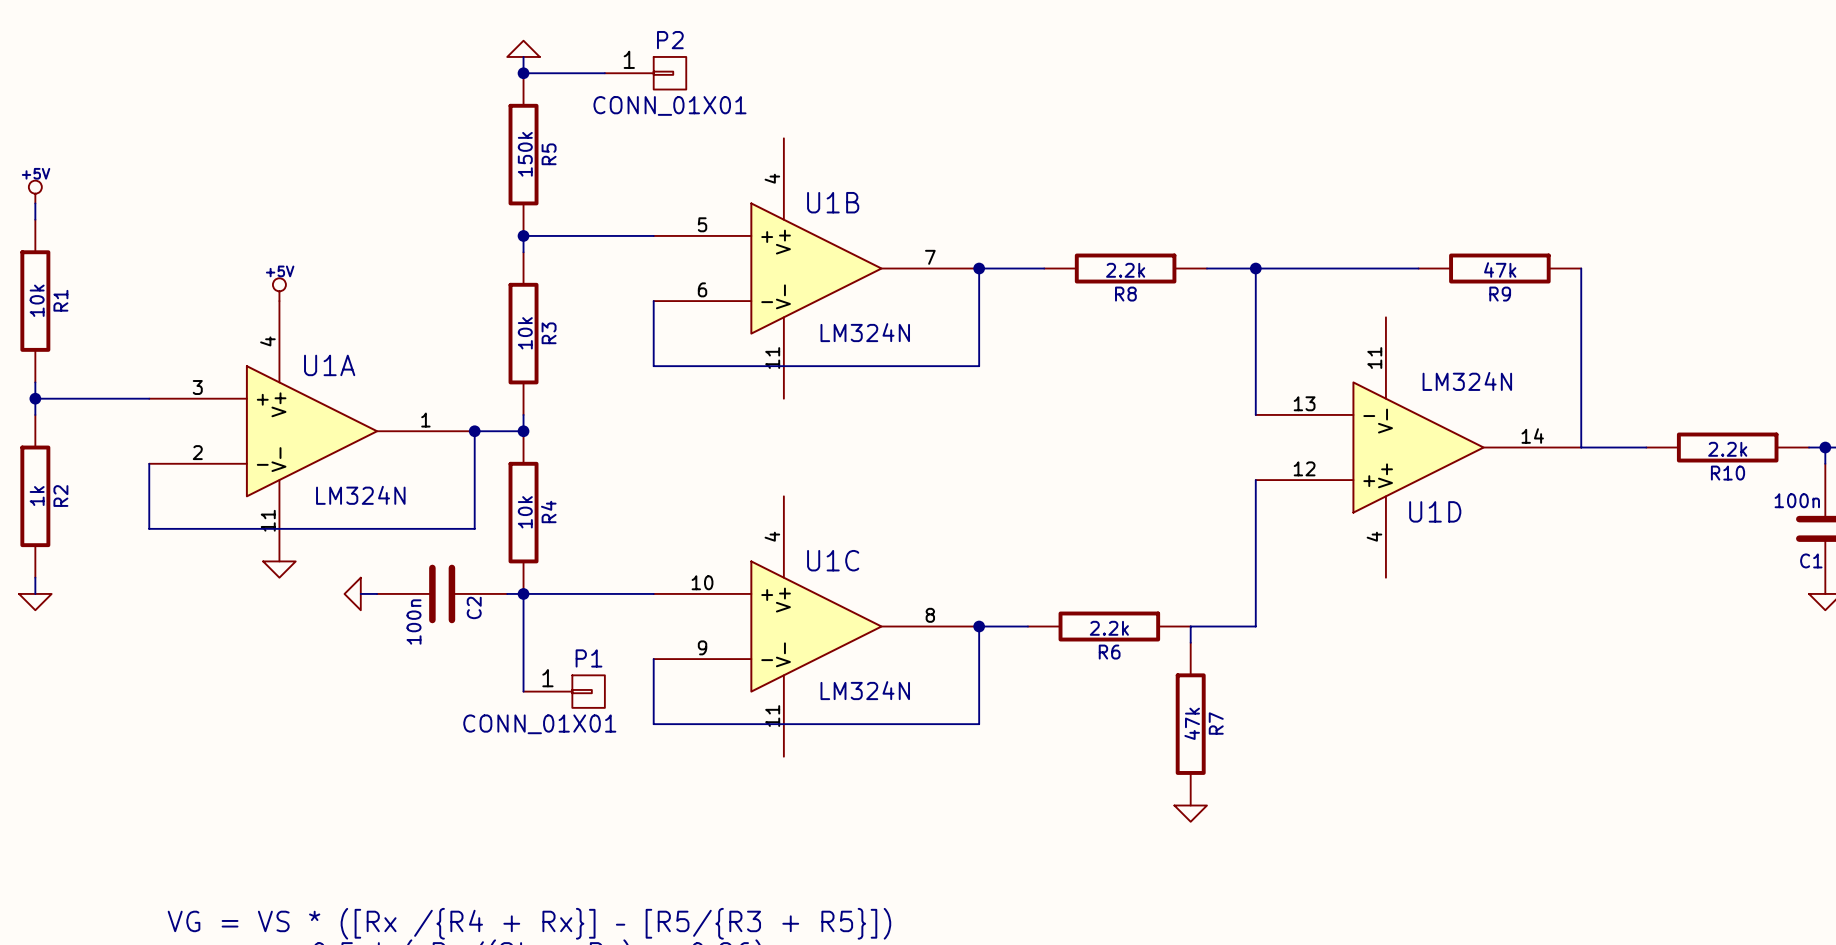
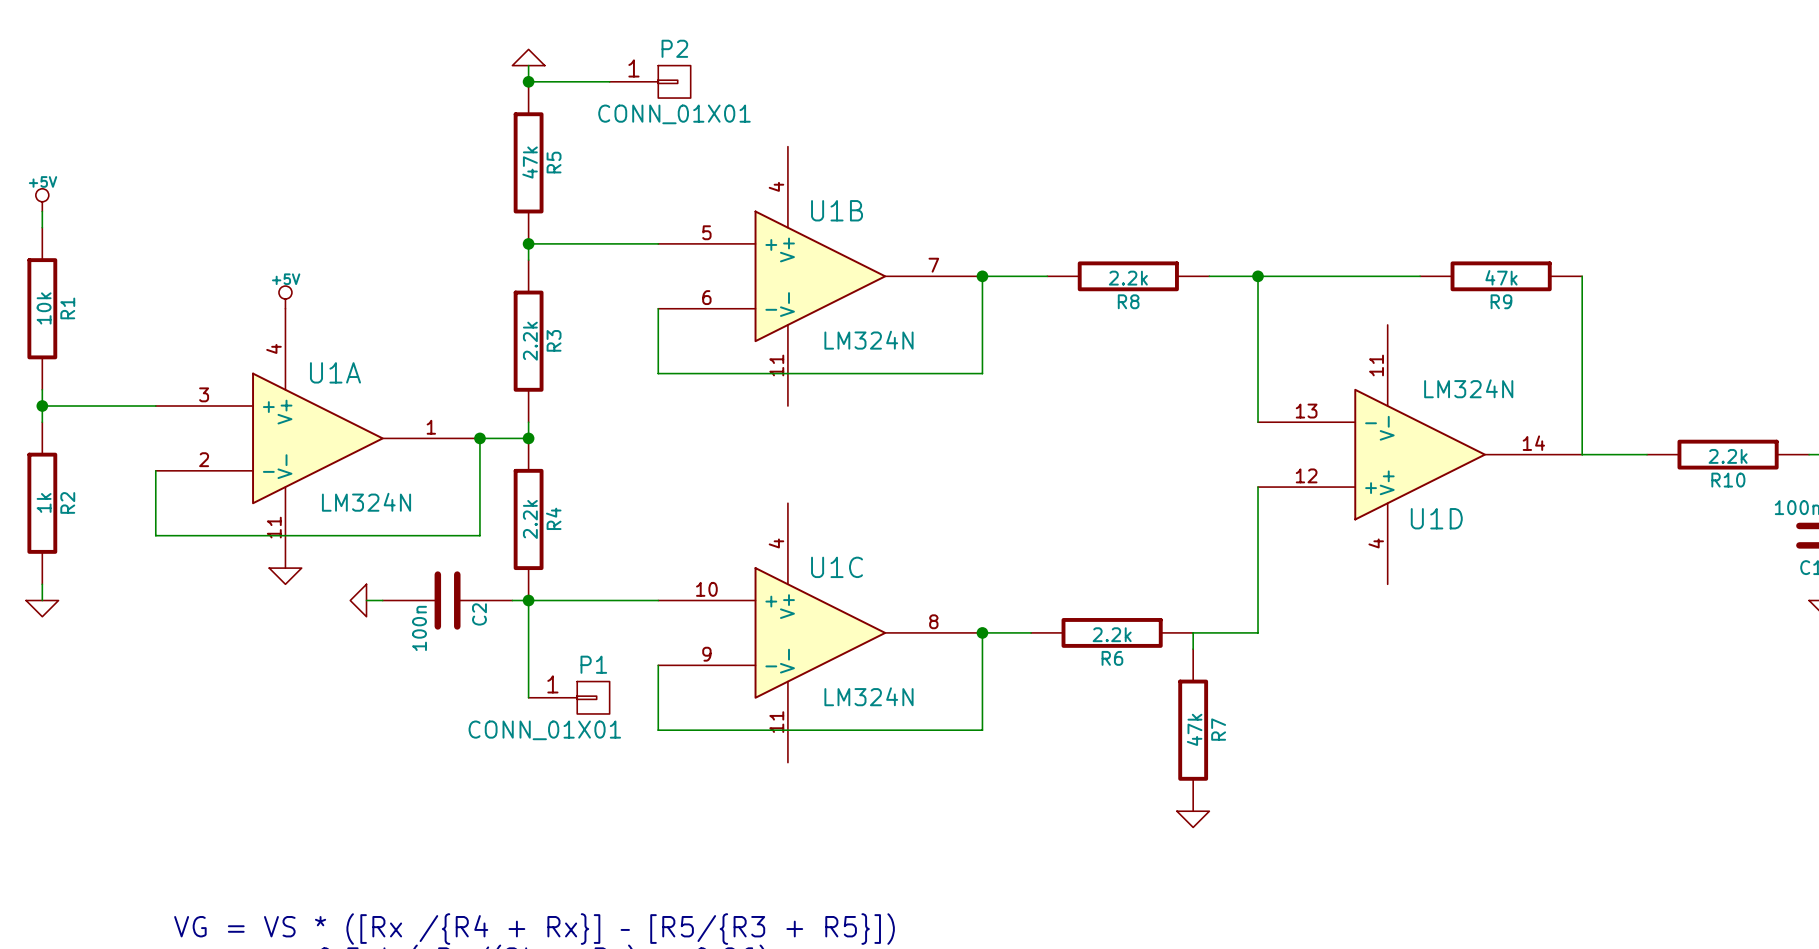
R5 value: 150k (525, 154) -> 47k (530, 162)
R3 value: 10k (525, 333) -> 2.2k (530, 341)
R4 value: 10k (525, 512) -> 2.2k (530, 519)

